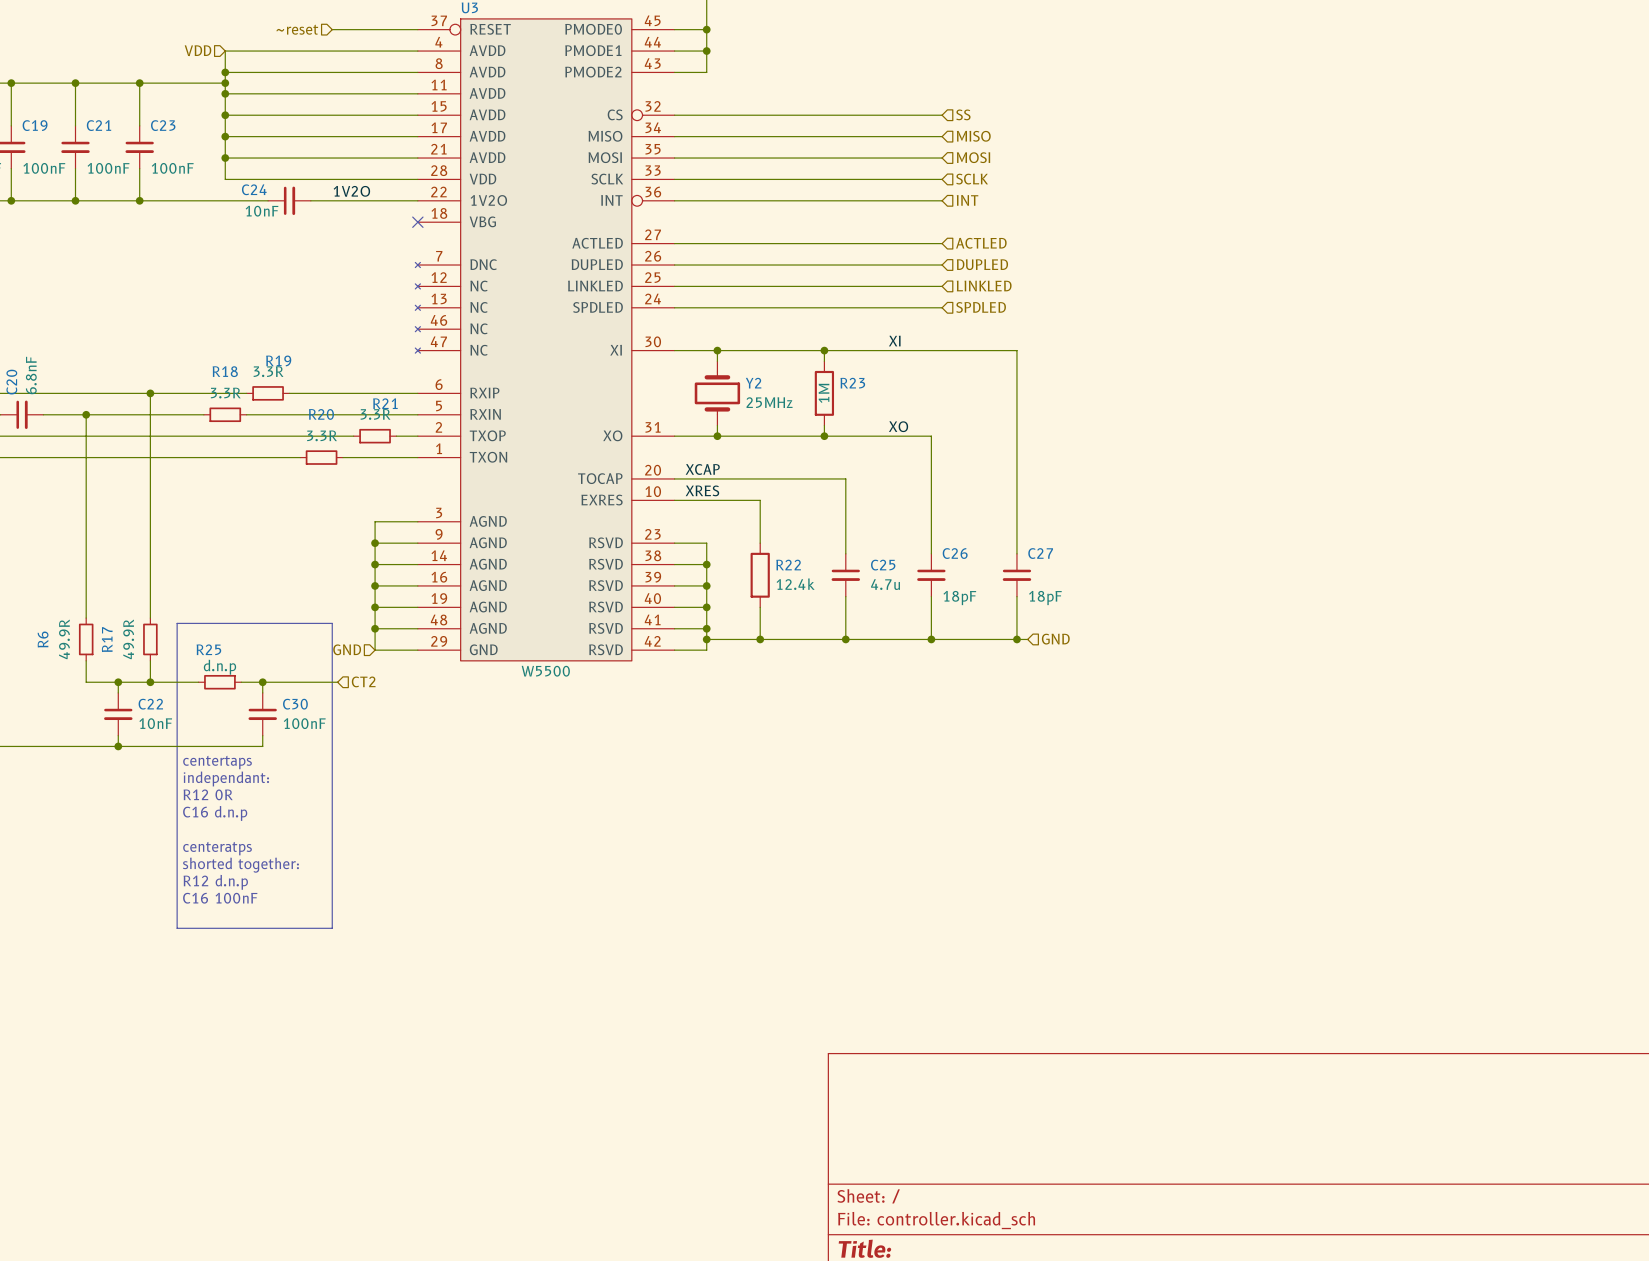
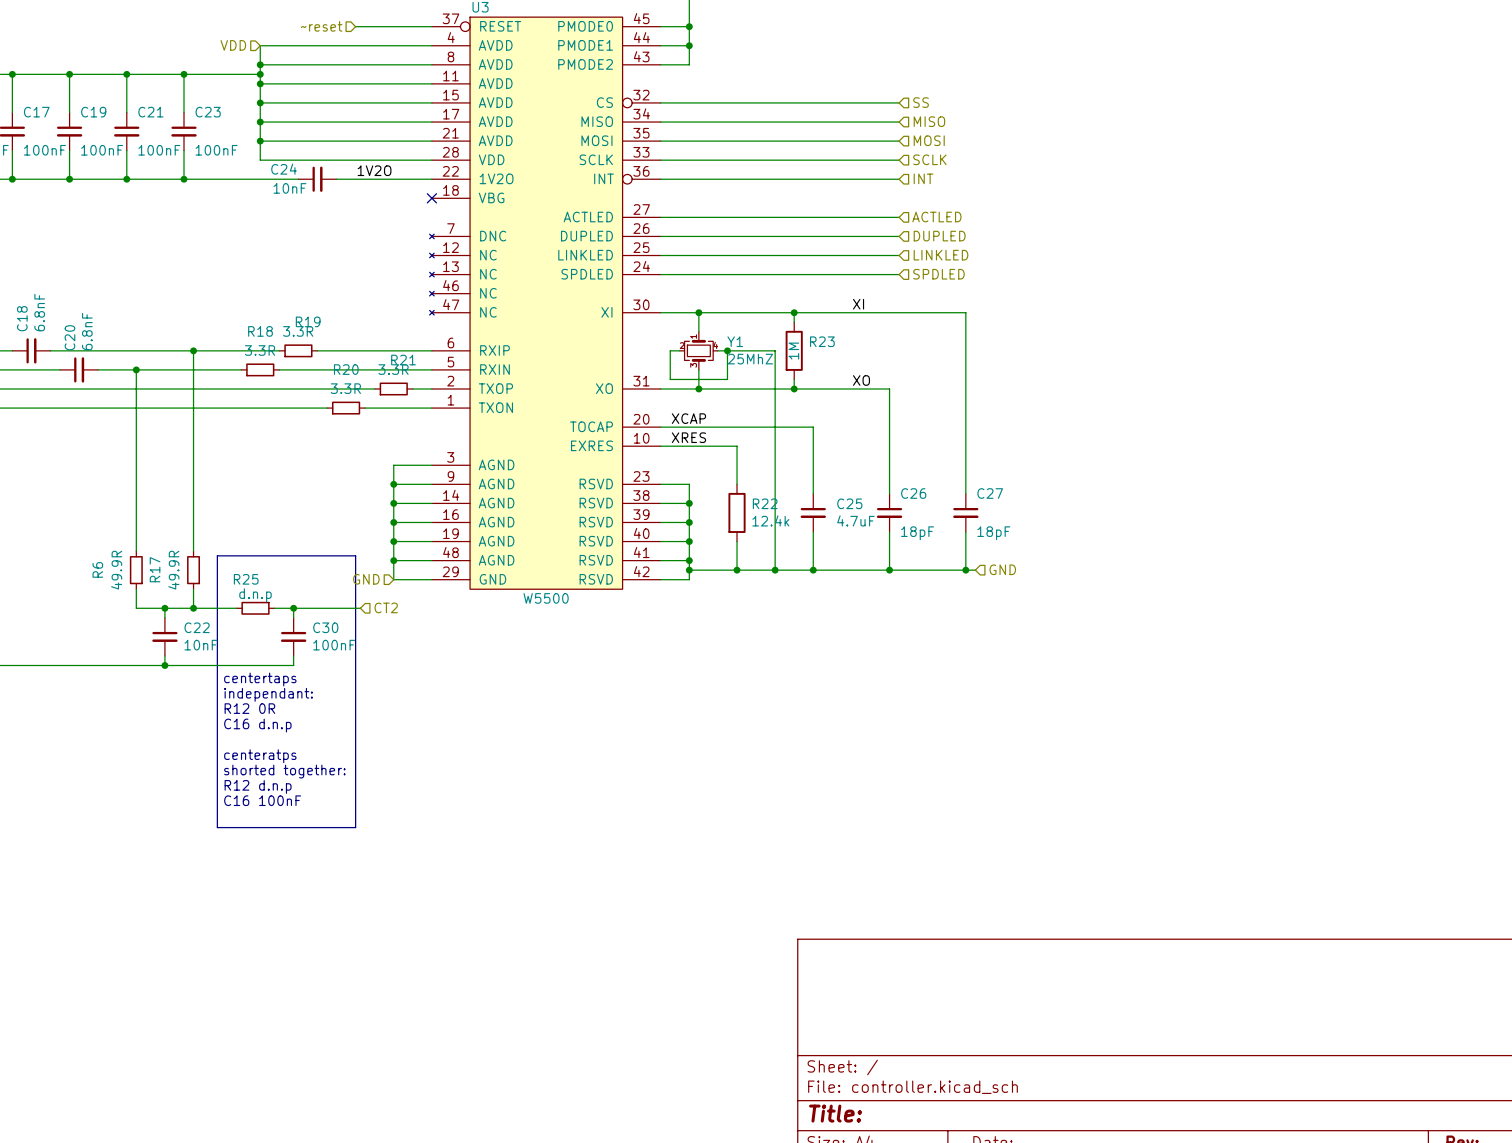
wire: none -> (679, 350) (670, 350) (670, 379) (727, 379) (727, 350)
Y2: 25MHz (717, 393) -> none
Y1: none -> 25MhZ (698, 350)
wire: none -> (717, 350) (775, 350) (775, 570)
junction: none -> (727, 350)
C25 value: 4.7u (885, 584) -> 4.7uF (855, 520)
junction: none -> (775, 570)

